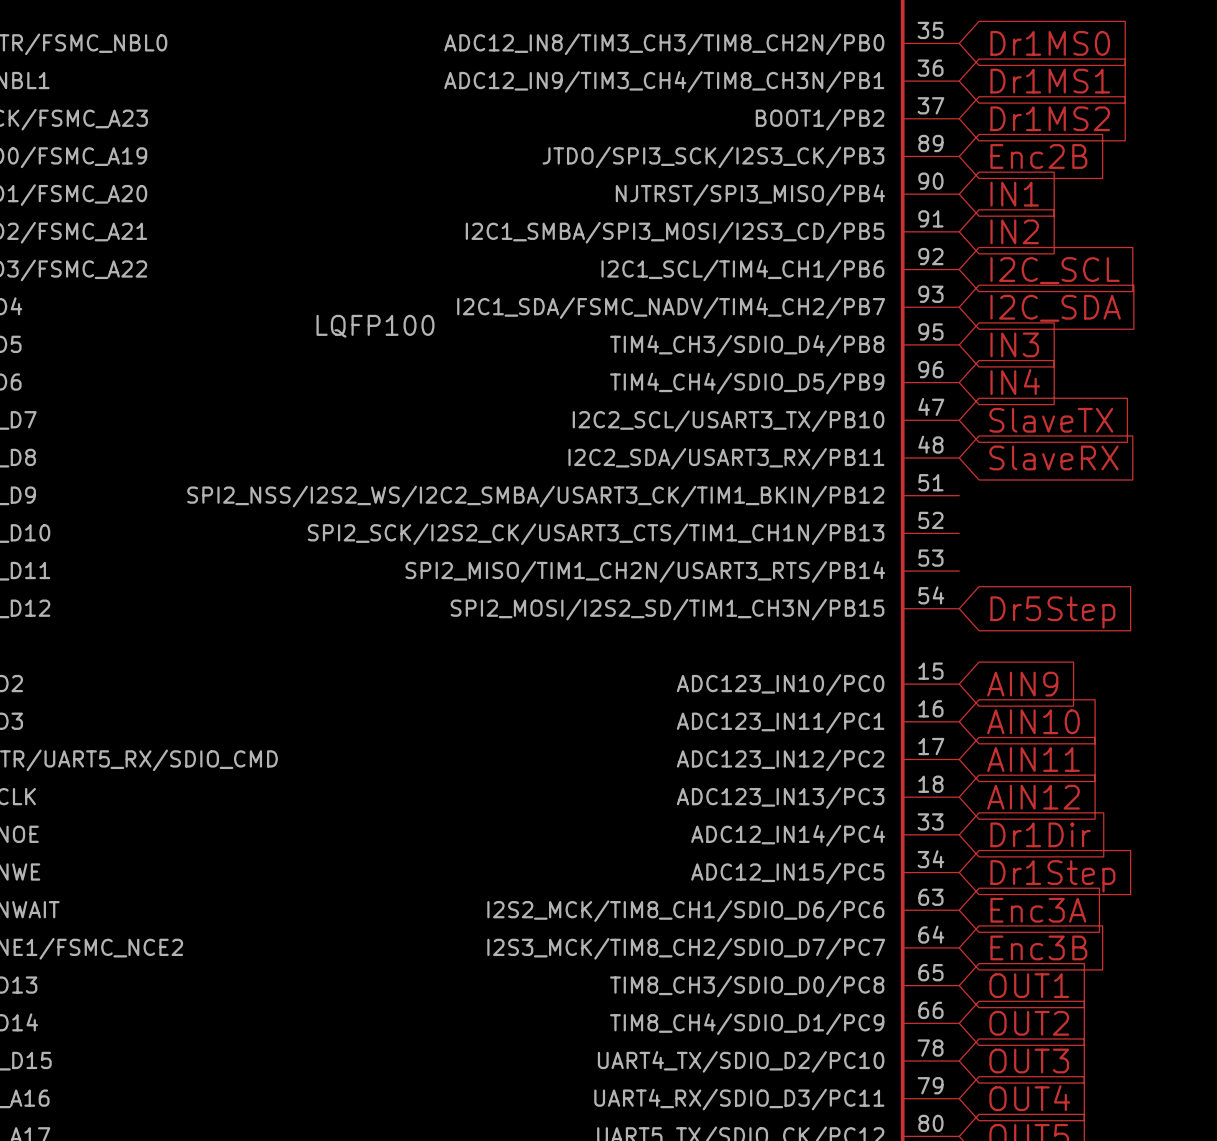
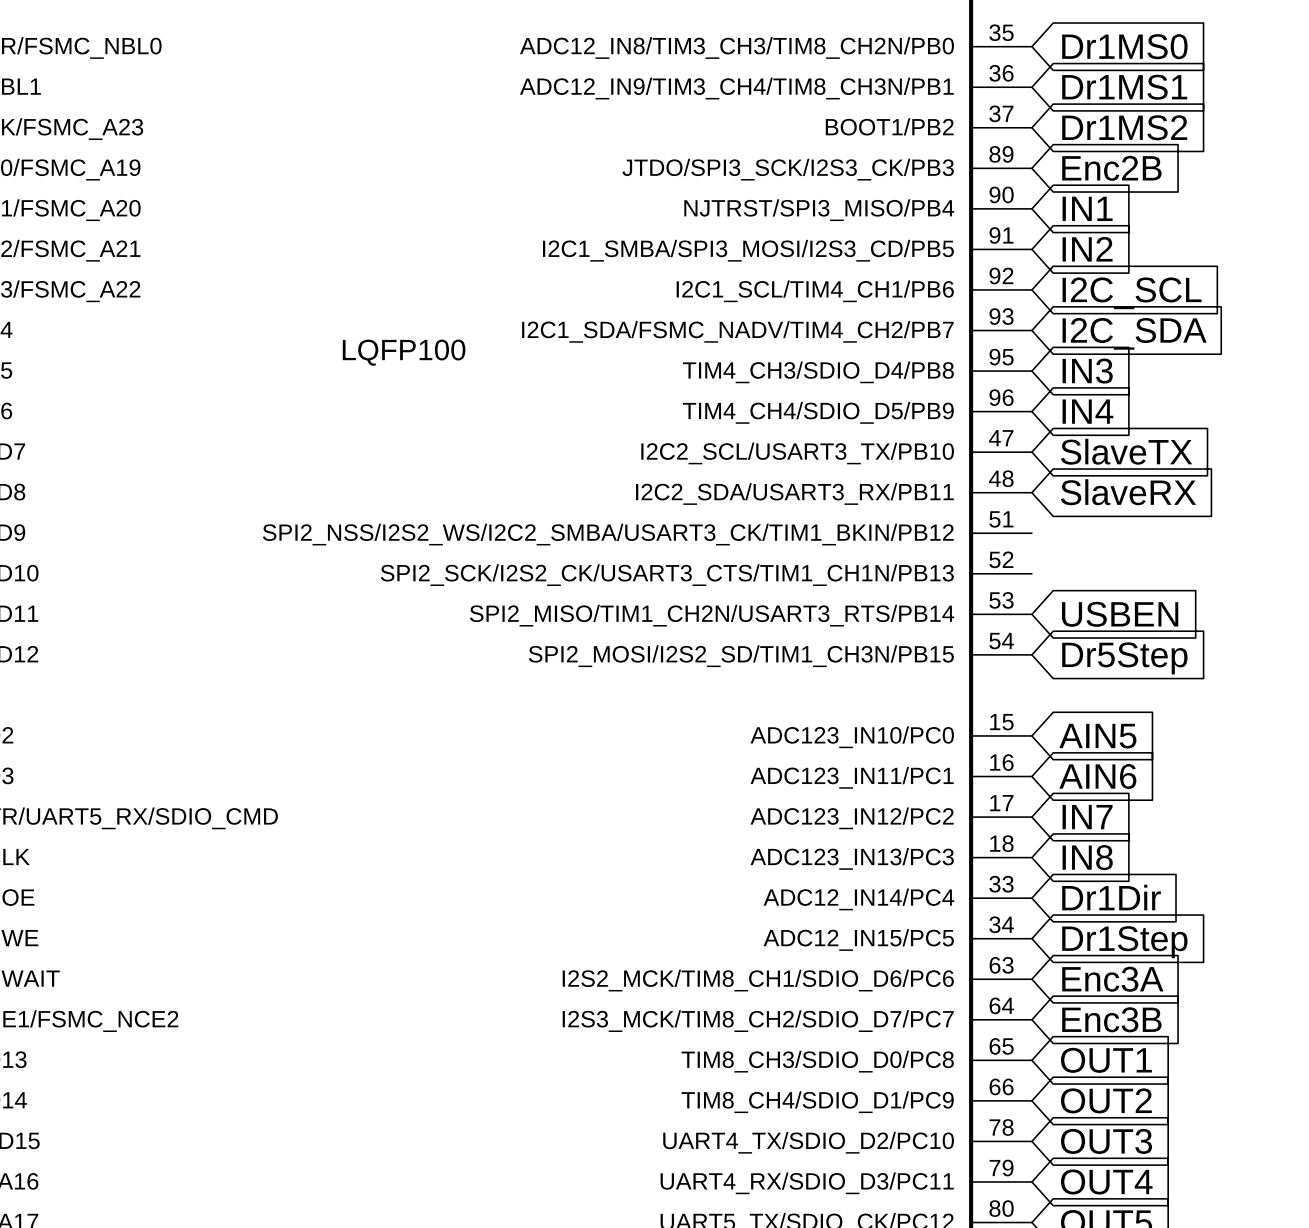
global label: none -> USBEN (1120, 614)
global label: AIN9 (1022, 684) -> AIN5 (1097, 736)
global label: AIN10 (1033, 721) -> AIN6 (1097, 776)
global label: AIN11 (1033, 759) -> IN7 (1087, 817)
global label: AIN12 (1033, 797) -> IN8 (1087, 857)

